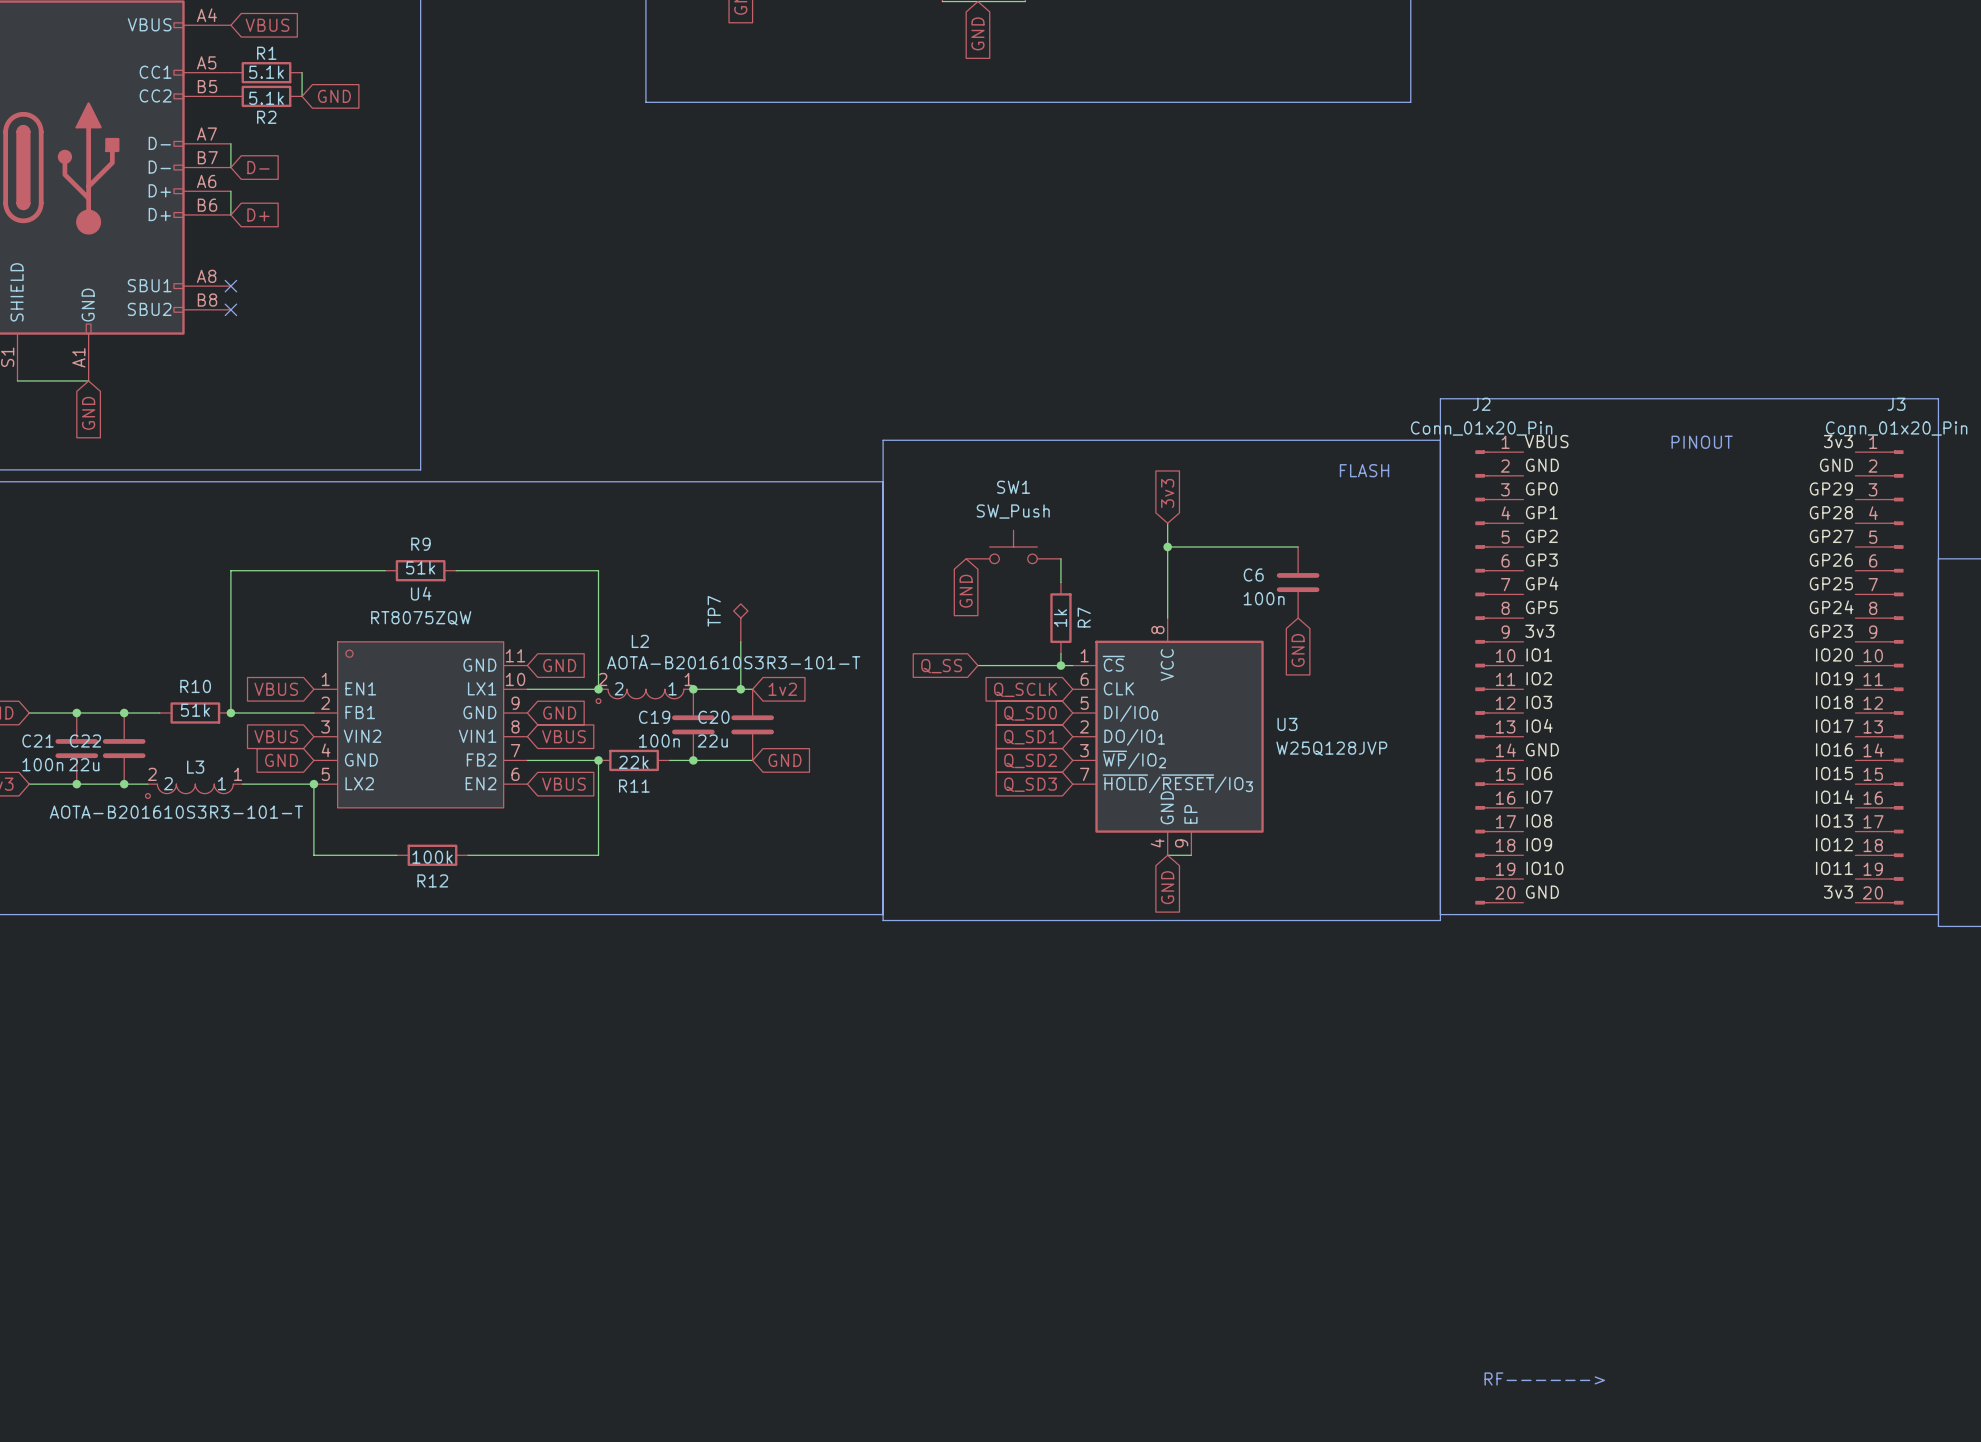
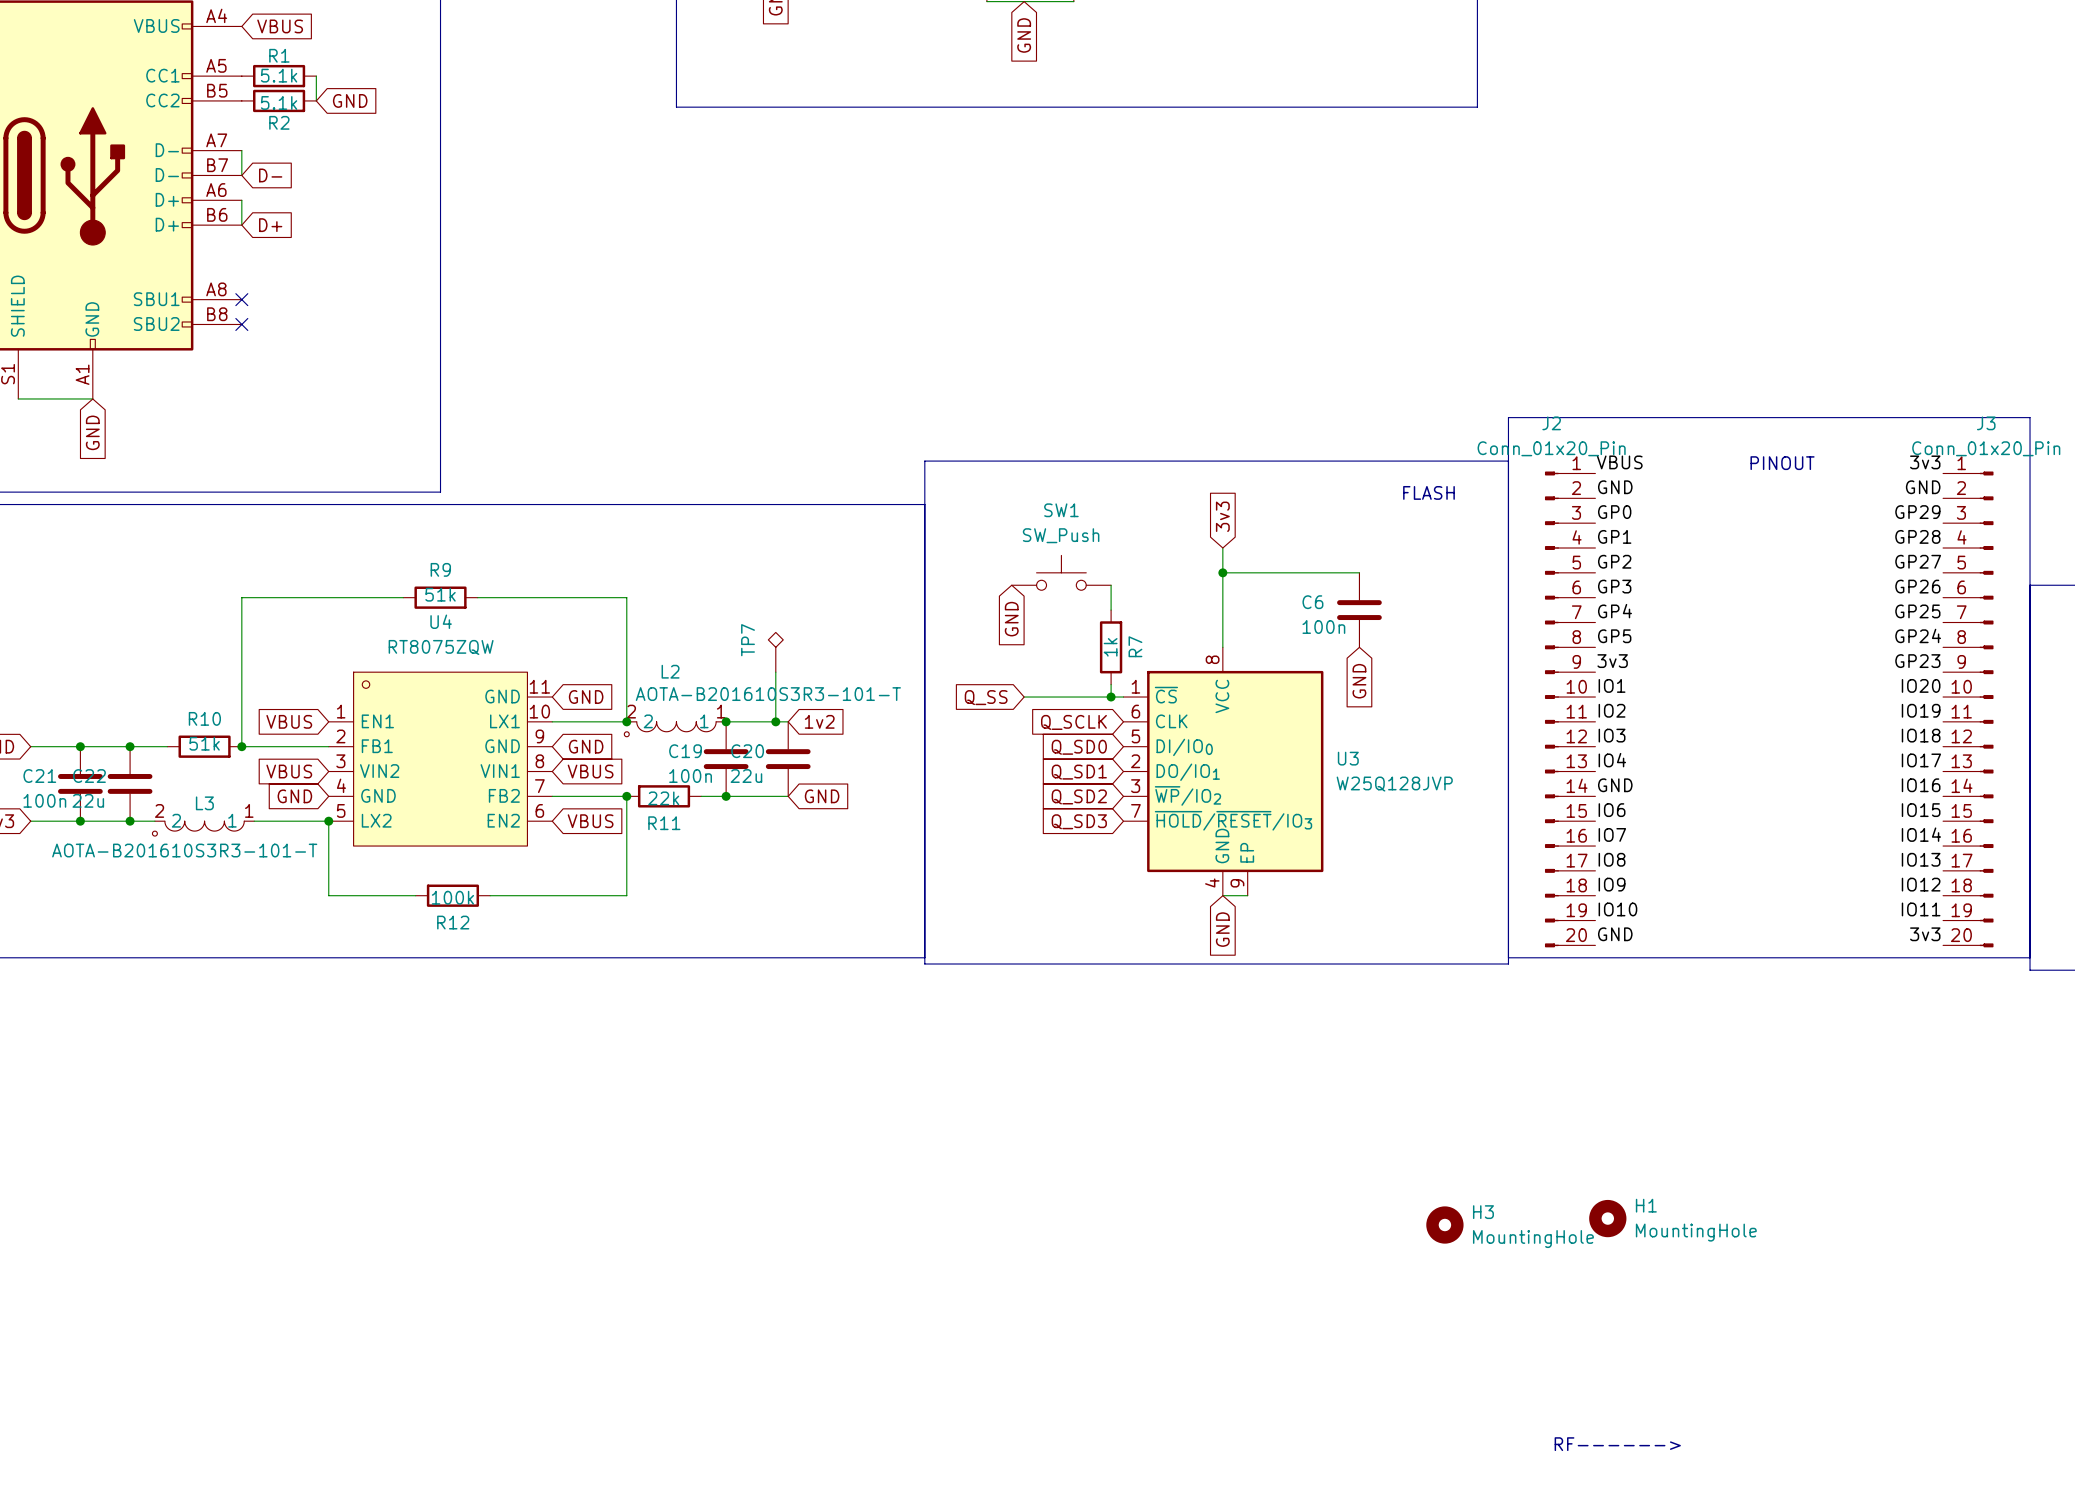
H1: none -> MountingHole (1607, 1218)
H3: none -> MountingHole (1444, 1225)

